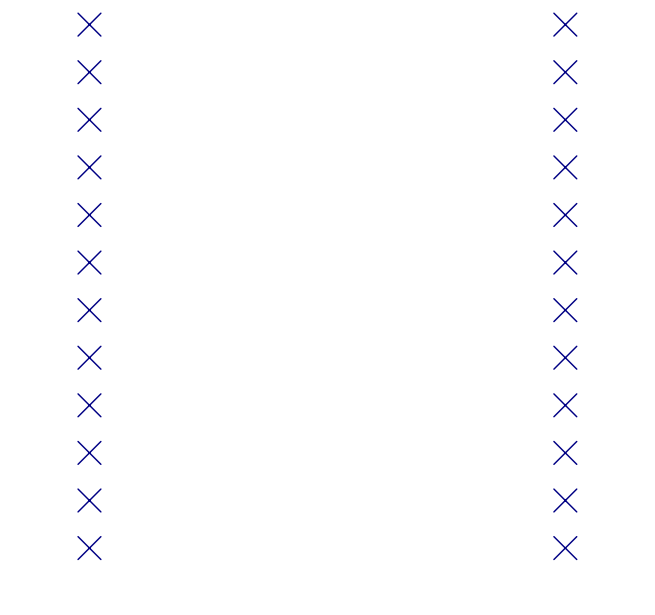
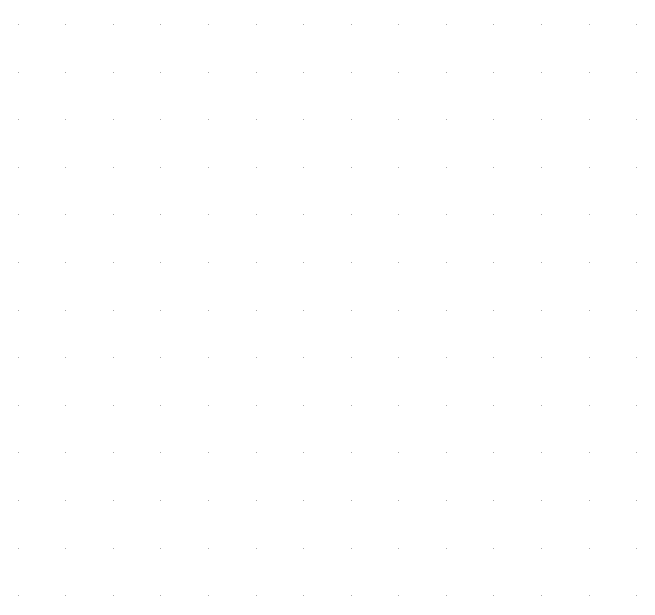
no-connect mark: (89, 24) -> none
no-connect mark: (565, 24) -> none
no-connect mark: (89, 72) -> none
no-connect mark: (565, 72) -> none
no-connect mark: (89, 119) -> none
no-connect mark: (565, 119) -> none
no-connect mark: (89, 167) -> none
no-connect mark: (565, 167) -> none
no-connect mark: (89, 214) -> none
no-connect mark: (565, 214) -> none
no-connect mark: (89, 262) -> none
no-connect mark: (565, 262) -> none
no-connect mark: (89, 310) -> none
no-connect mark: (565, 310) -> none
no-connect mark: (89, 357) -> none
no-connect mark: (565, 357) -> none
no-connect mark: (89, 405) -> none
no-connect mark: (565, 405) -> none
no-connect mark: (89, 452) -> none
no-connect mark: (565, 452) -> none
no-connect mark: (89, 500) -> none
no-connect mark: (565, 500) -> none
no-connect mark: (89, 548) -> none
no-connect mark: (565, 548) -> none

